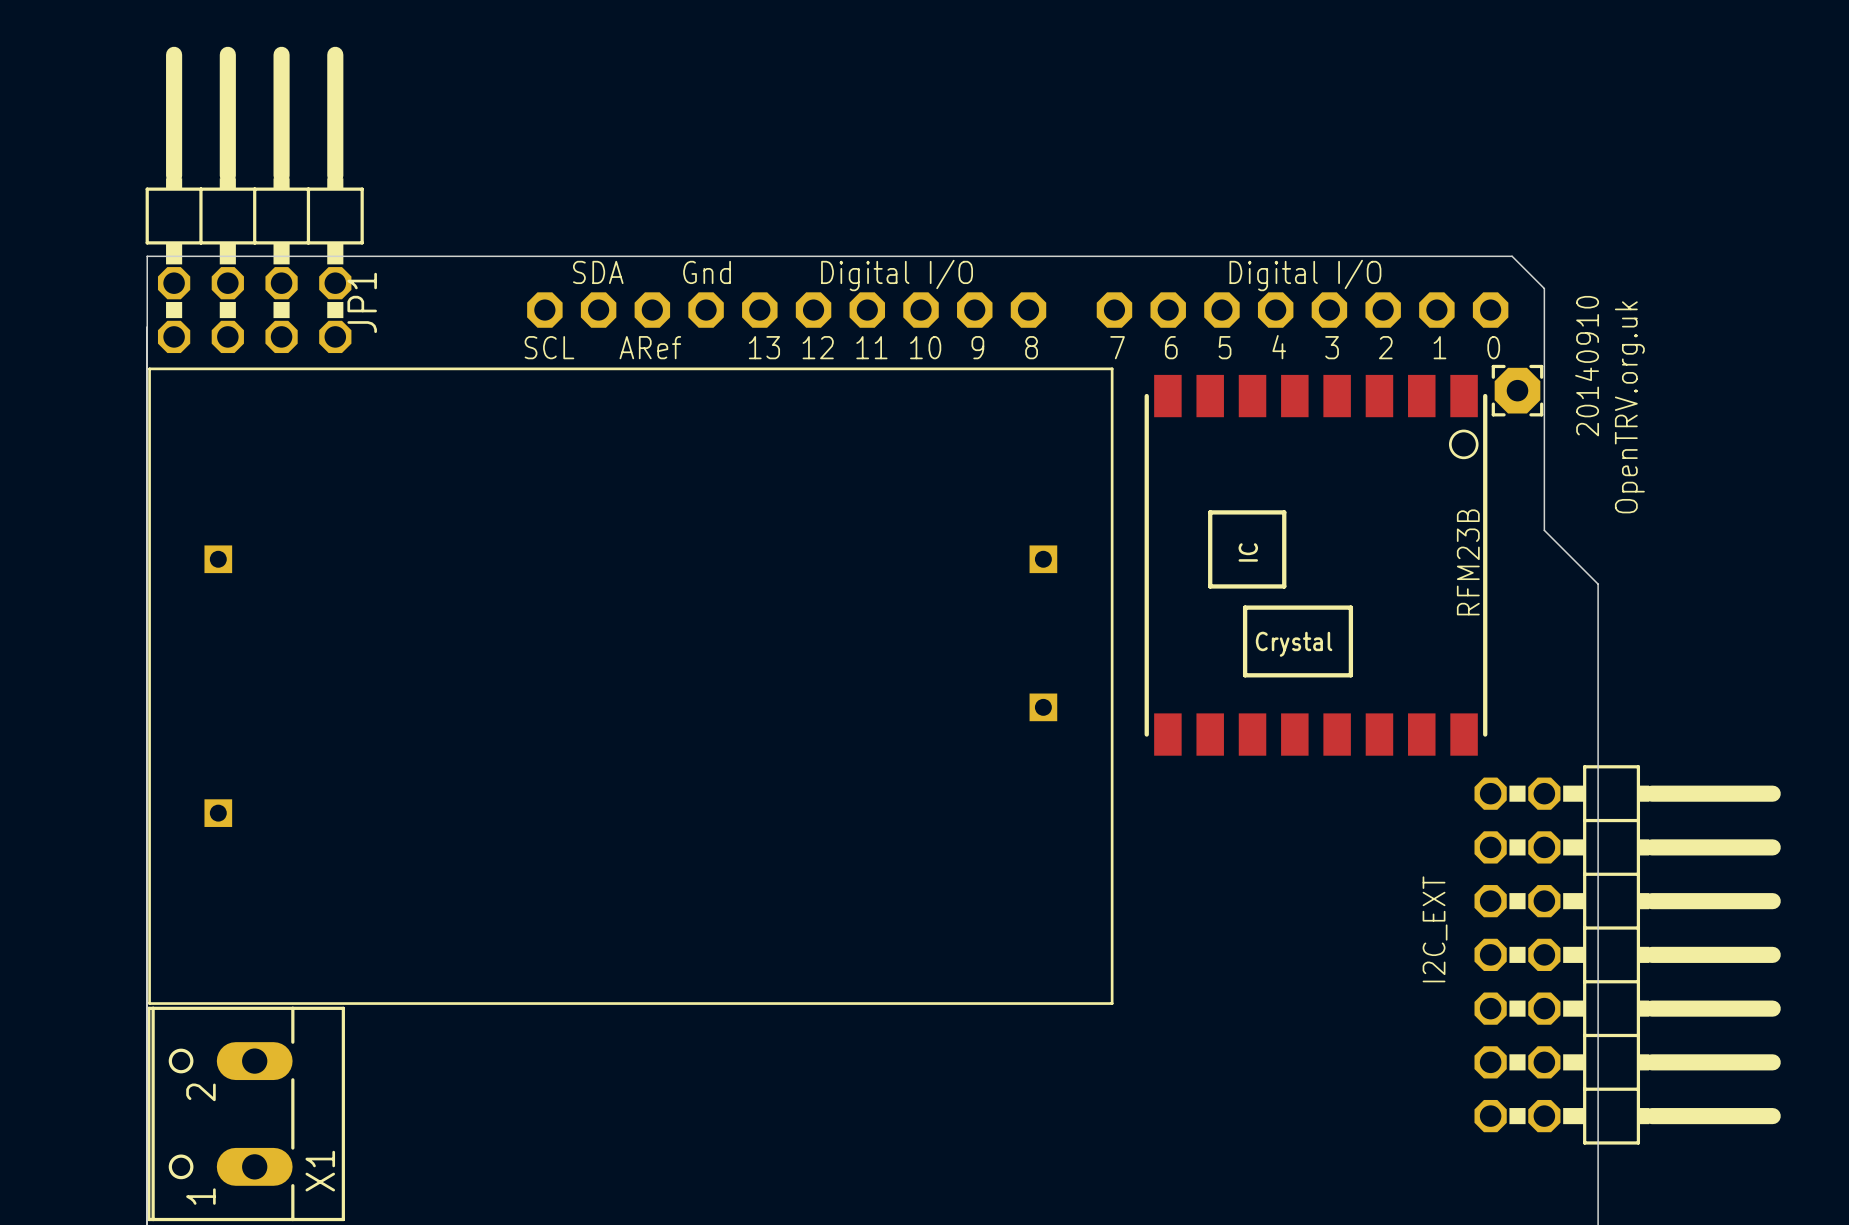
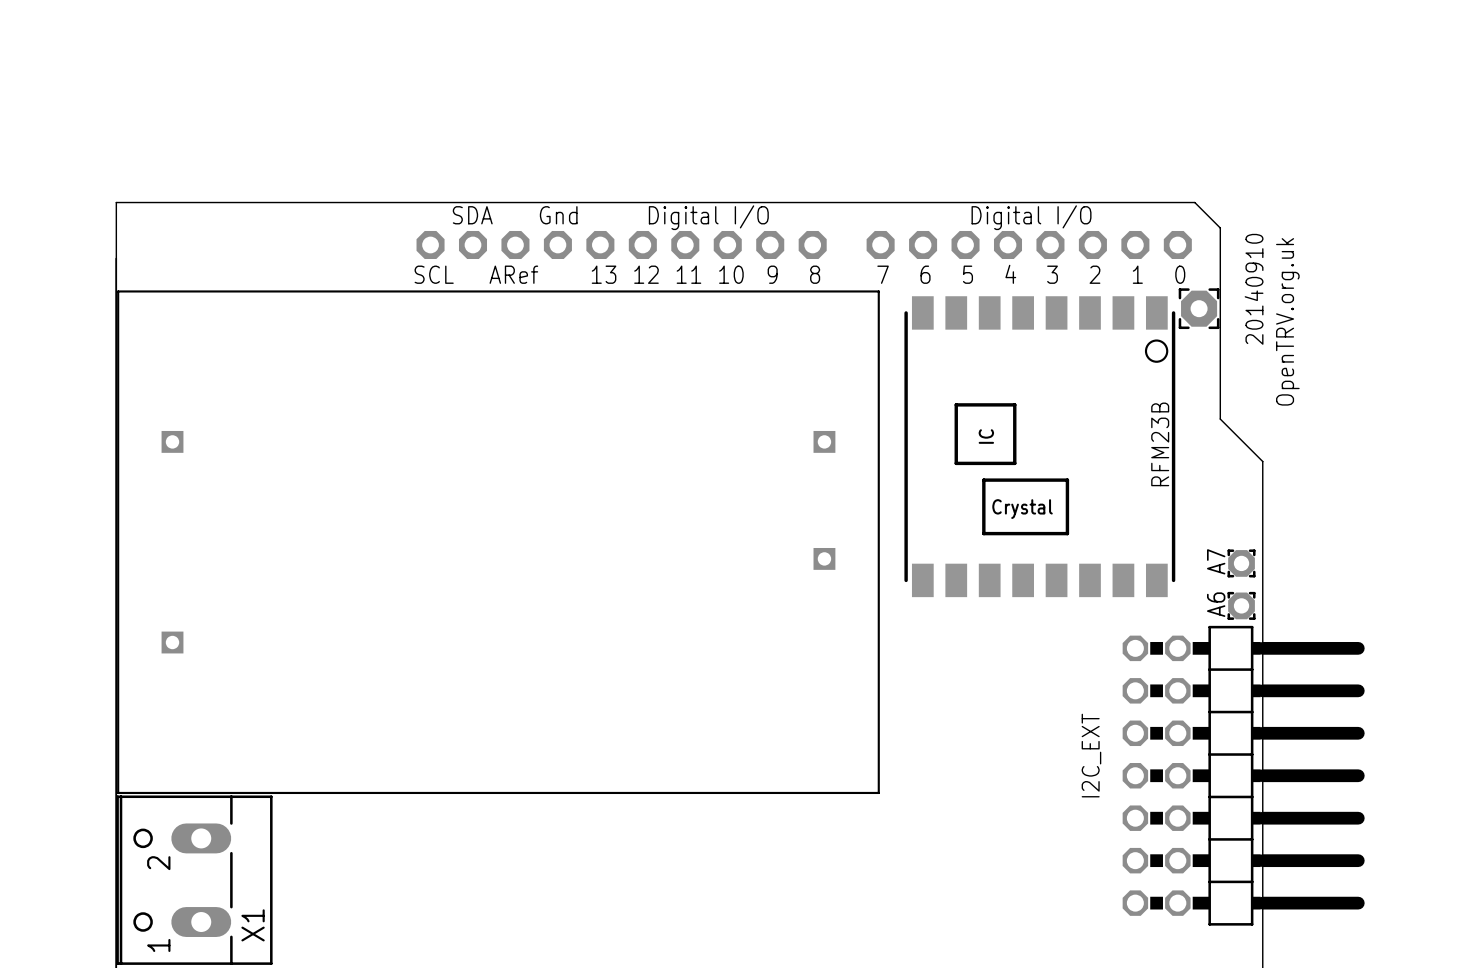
JP1: (254, 199) -> none
A7: none -> (1241, 563)
A6: none -> (1241, 605)
I2C_EXT position: (1627, 954) -> (1243, 775)

